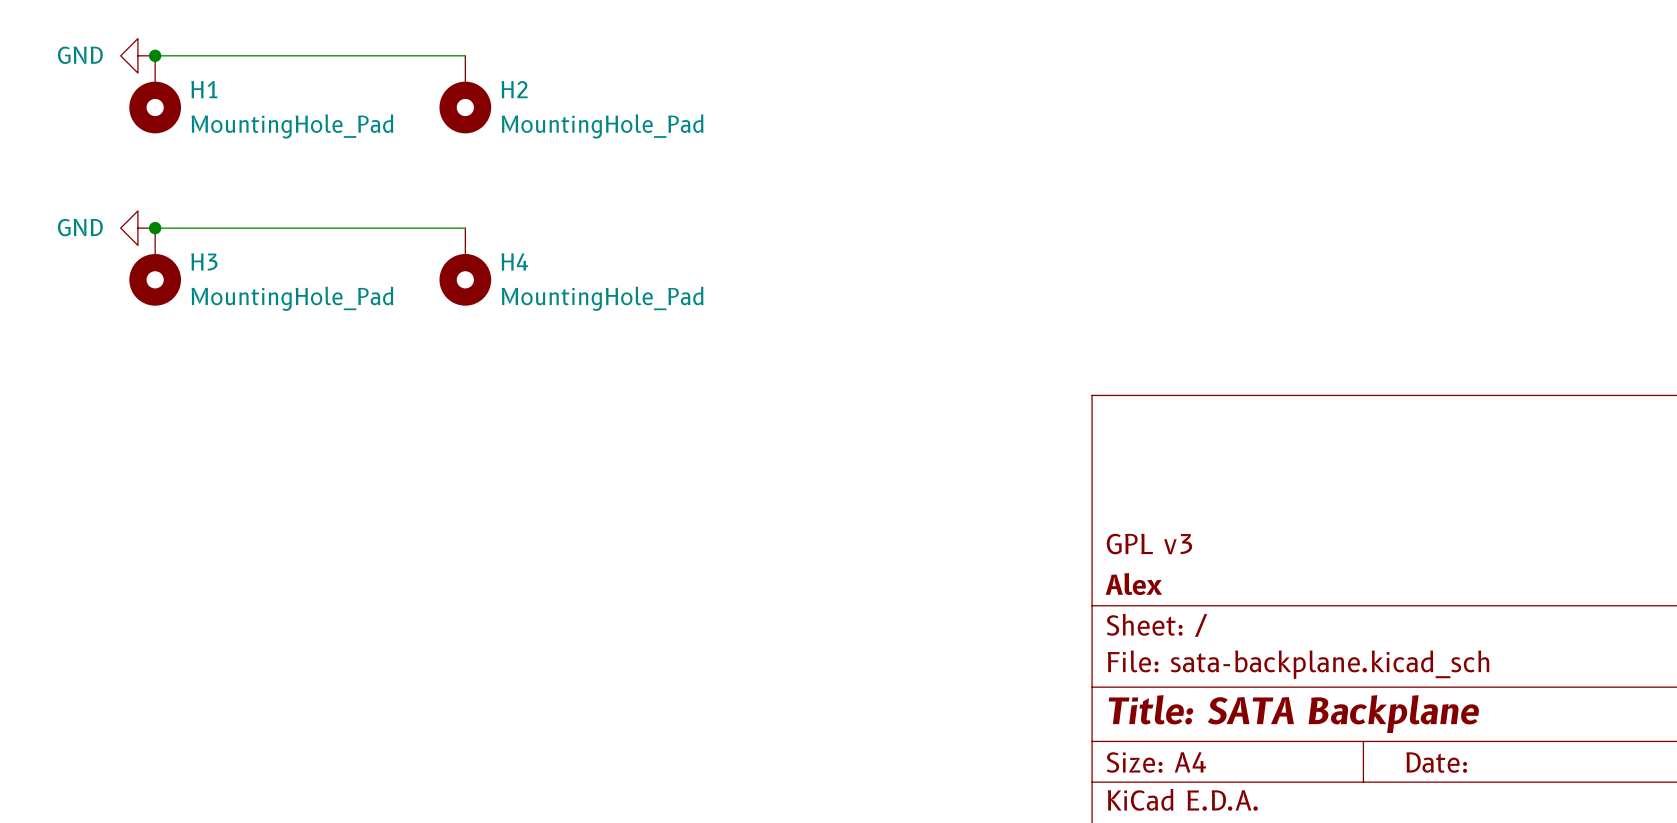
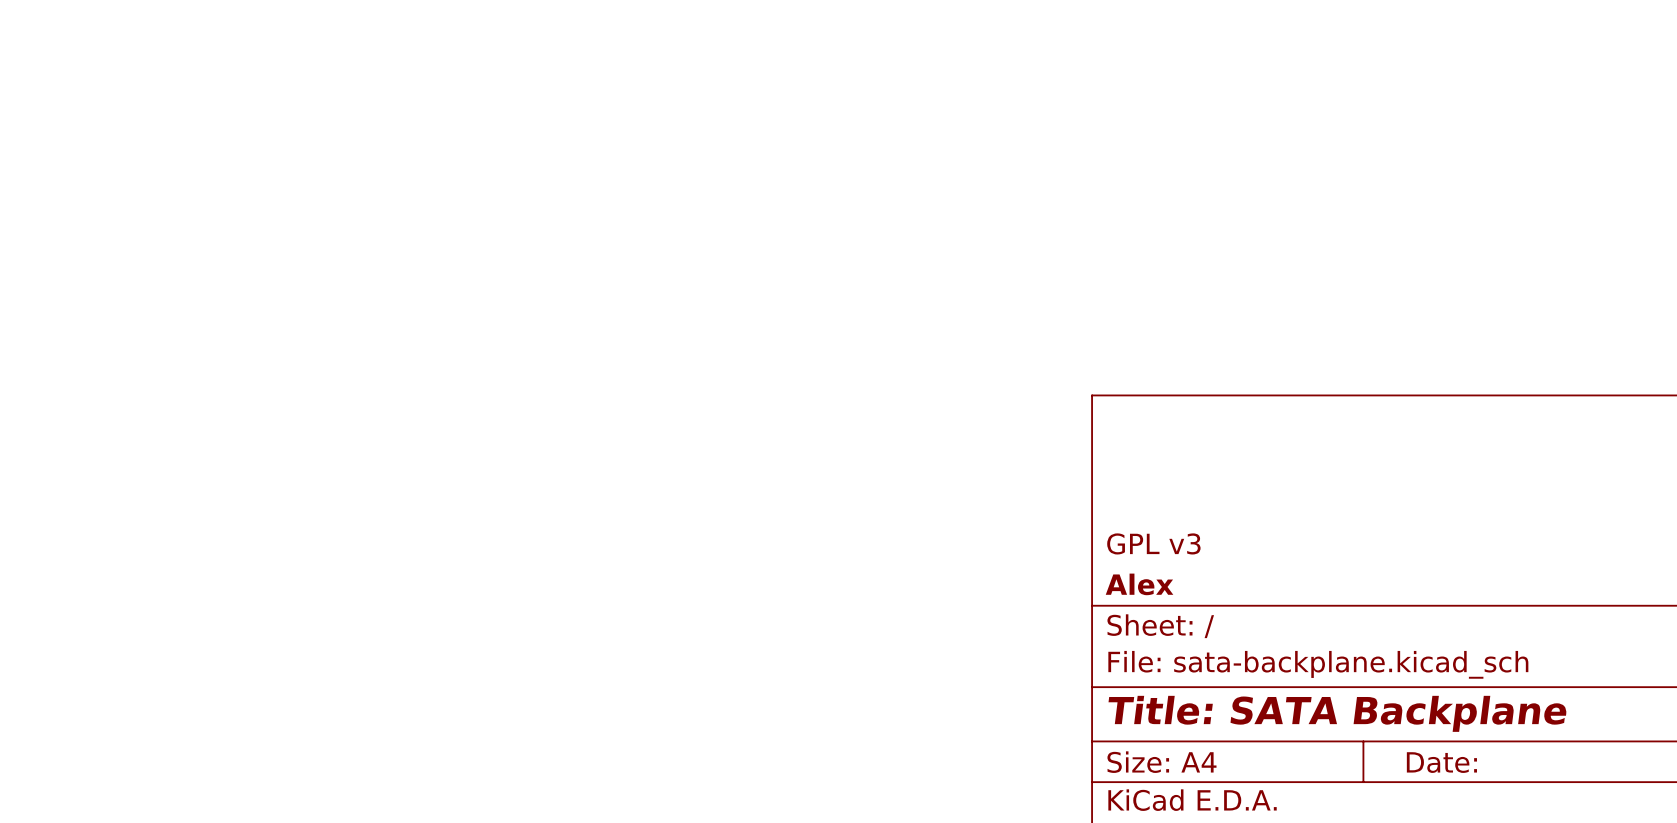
power symbol: GND (137, 55) -> none
wire: (155, 55) (465, 55) -> none
junction: (155, 55) -> none
H1: MountingHole_Pad (155, 94) -> none
H2: MountingHole_Pad (465, 94) -> none
power symbol: GND (137, 228) -> none
wire: (155, 228) (465, 228) -> none
junction: (155, 228) -> none
H3: MountingHole_Pad (155, 266) -> none
H4: MountingHole_Pad (465, 266) -> none

